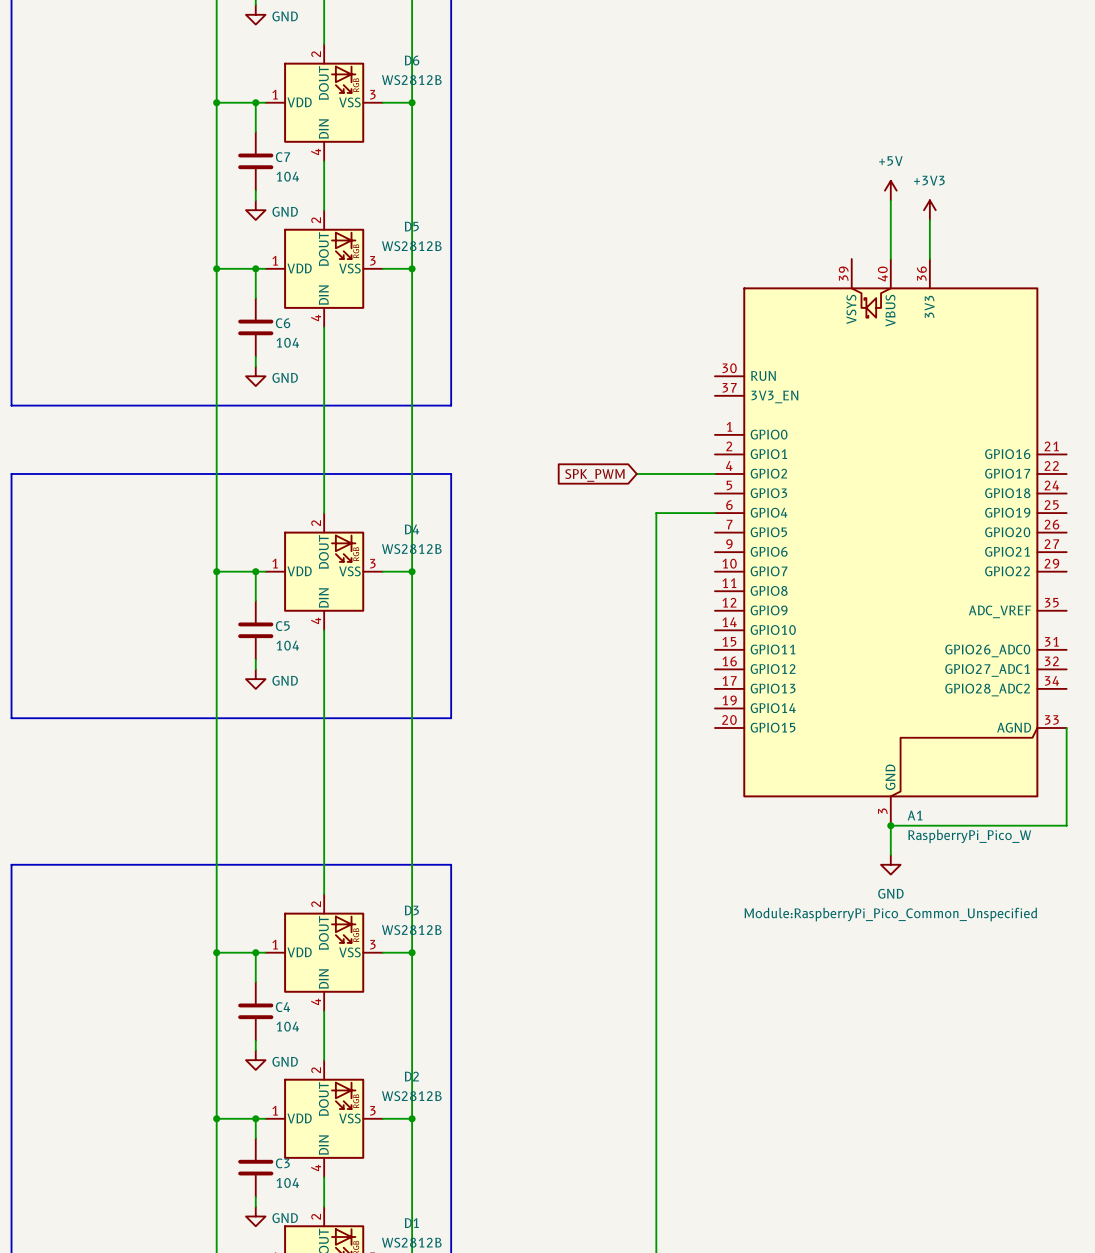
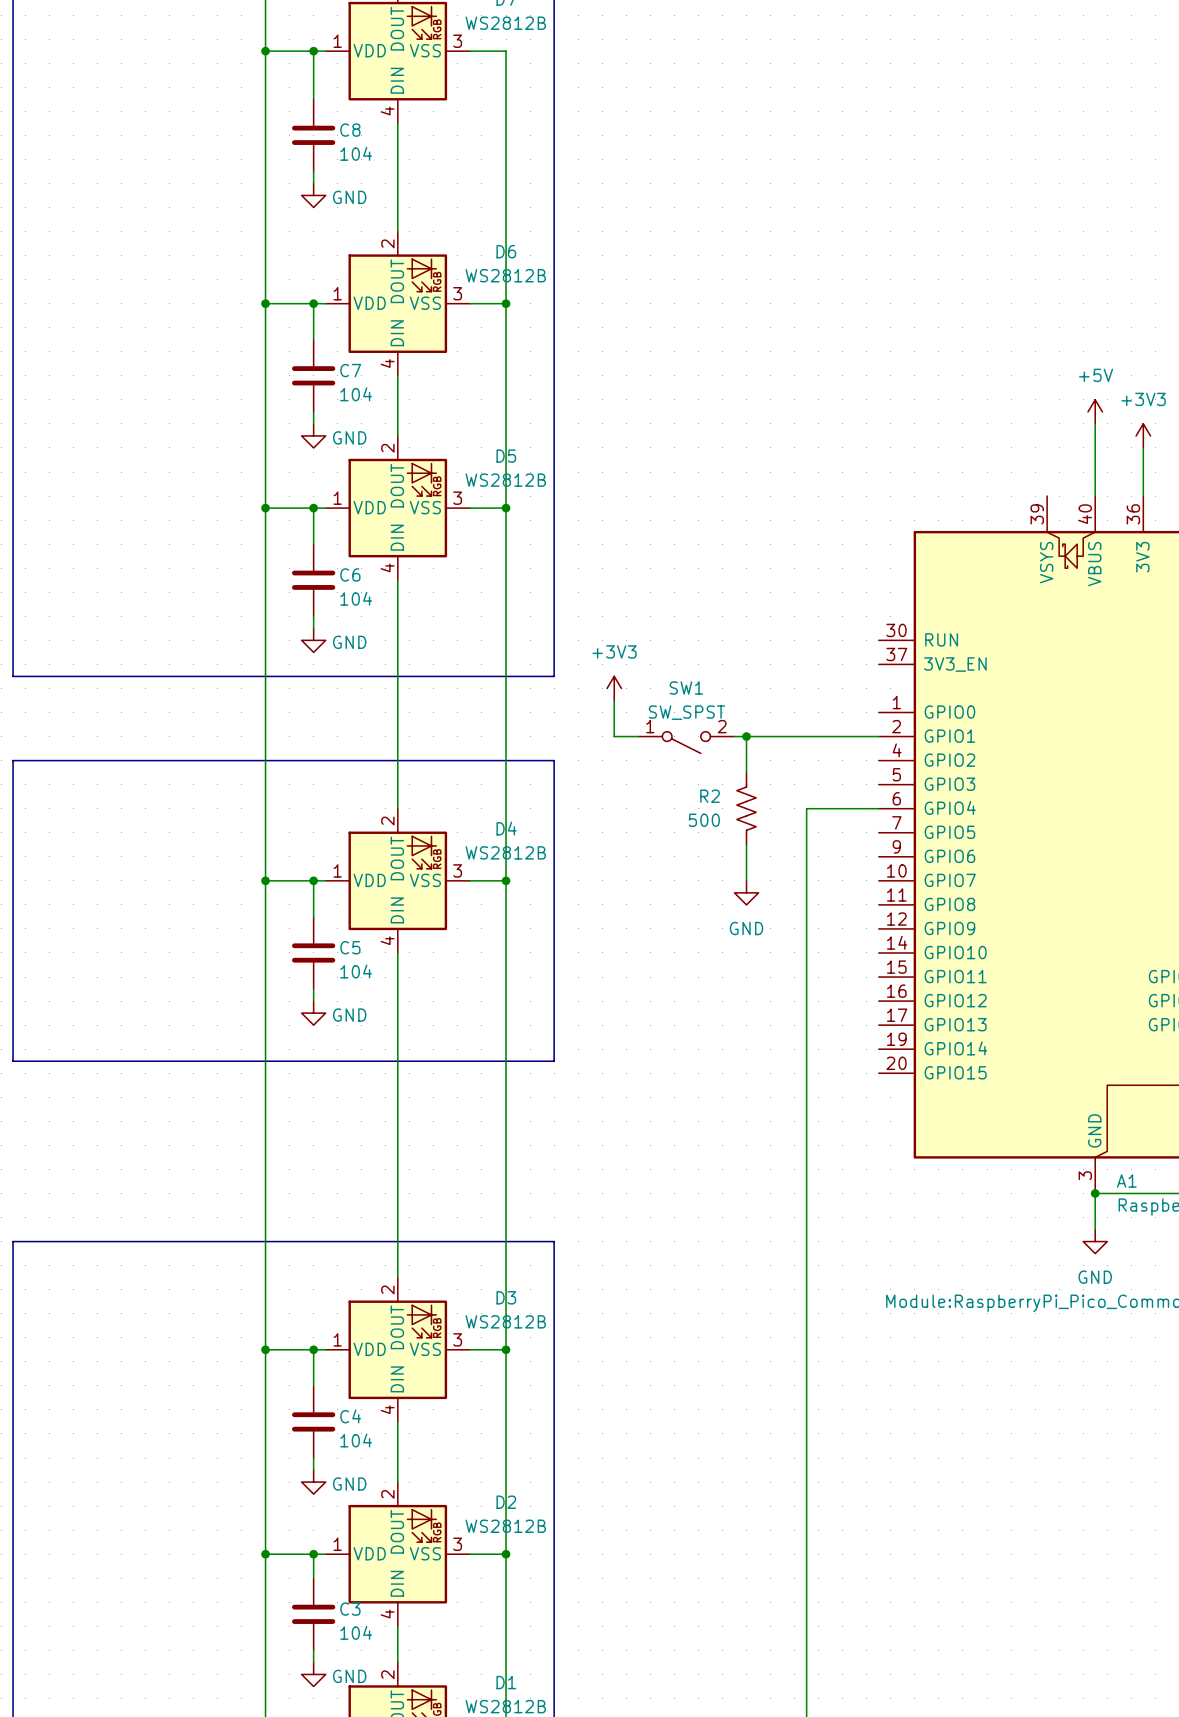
power symbol: none -> +3V3 (614, 688)
wire: none -> (614, 700) (614, 736) (638, 736)
wire: none -> (734, 736) (878, 736)
wire: none -> (746, 736) (746, 772)
junction: none -> (746, 736)
SW1: none -> SW_SPST (686, 742)
wire: (636, 473) (714, 473) -> none
global label: SPK_PWM (594, 475) -> none
R2: none -> 500 (746, 808)
wire: none -> (746, 844) (746, 880)
power symbol: none -> GND (746, 892)

